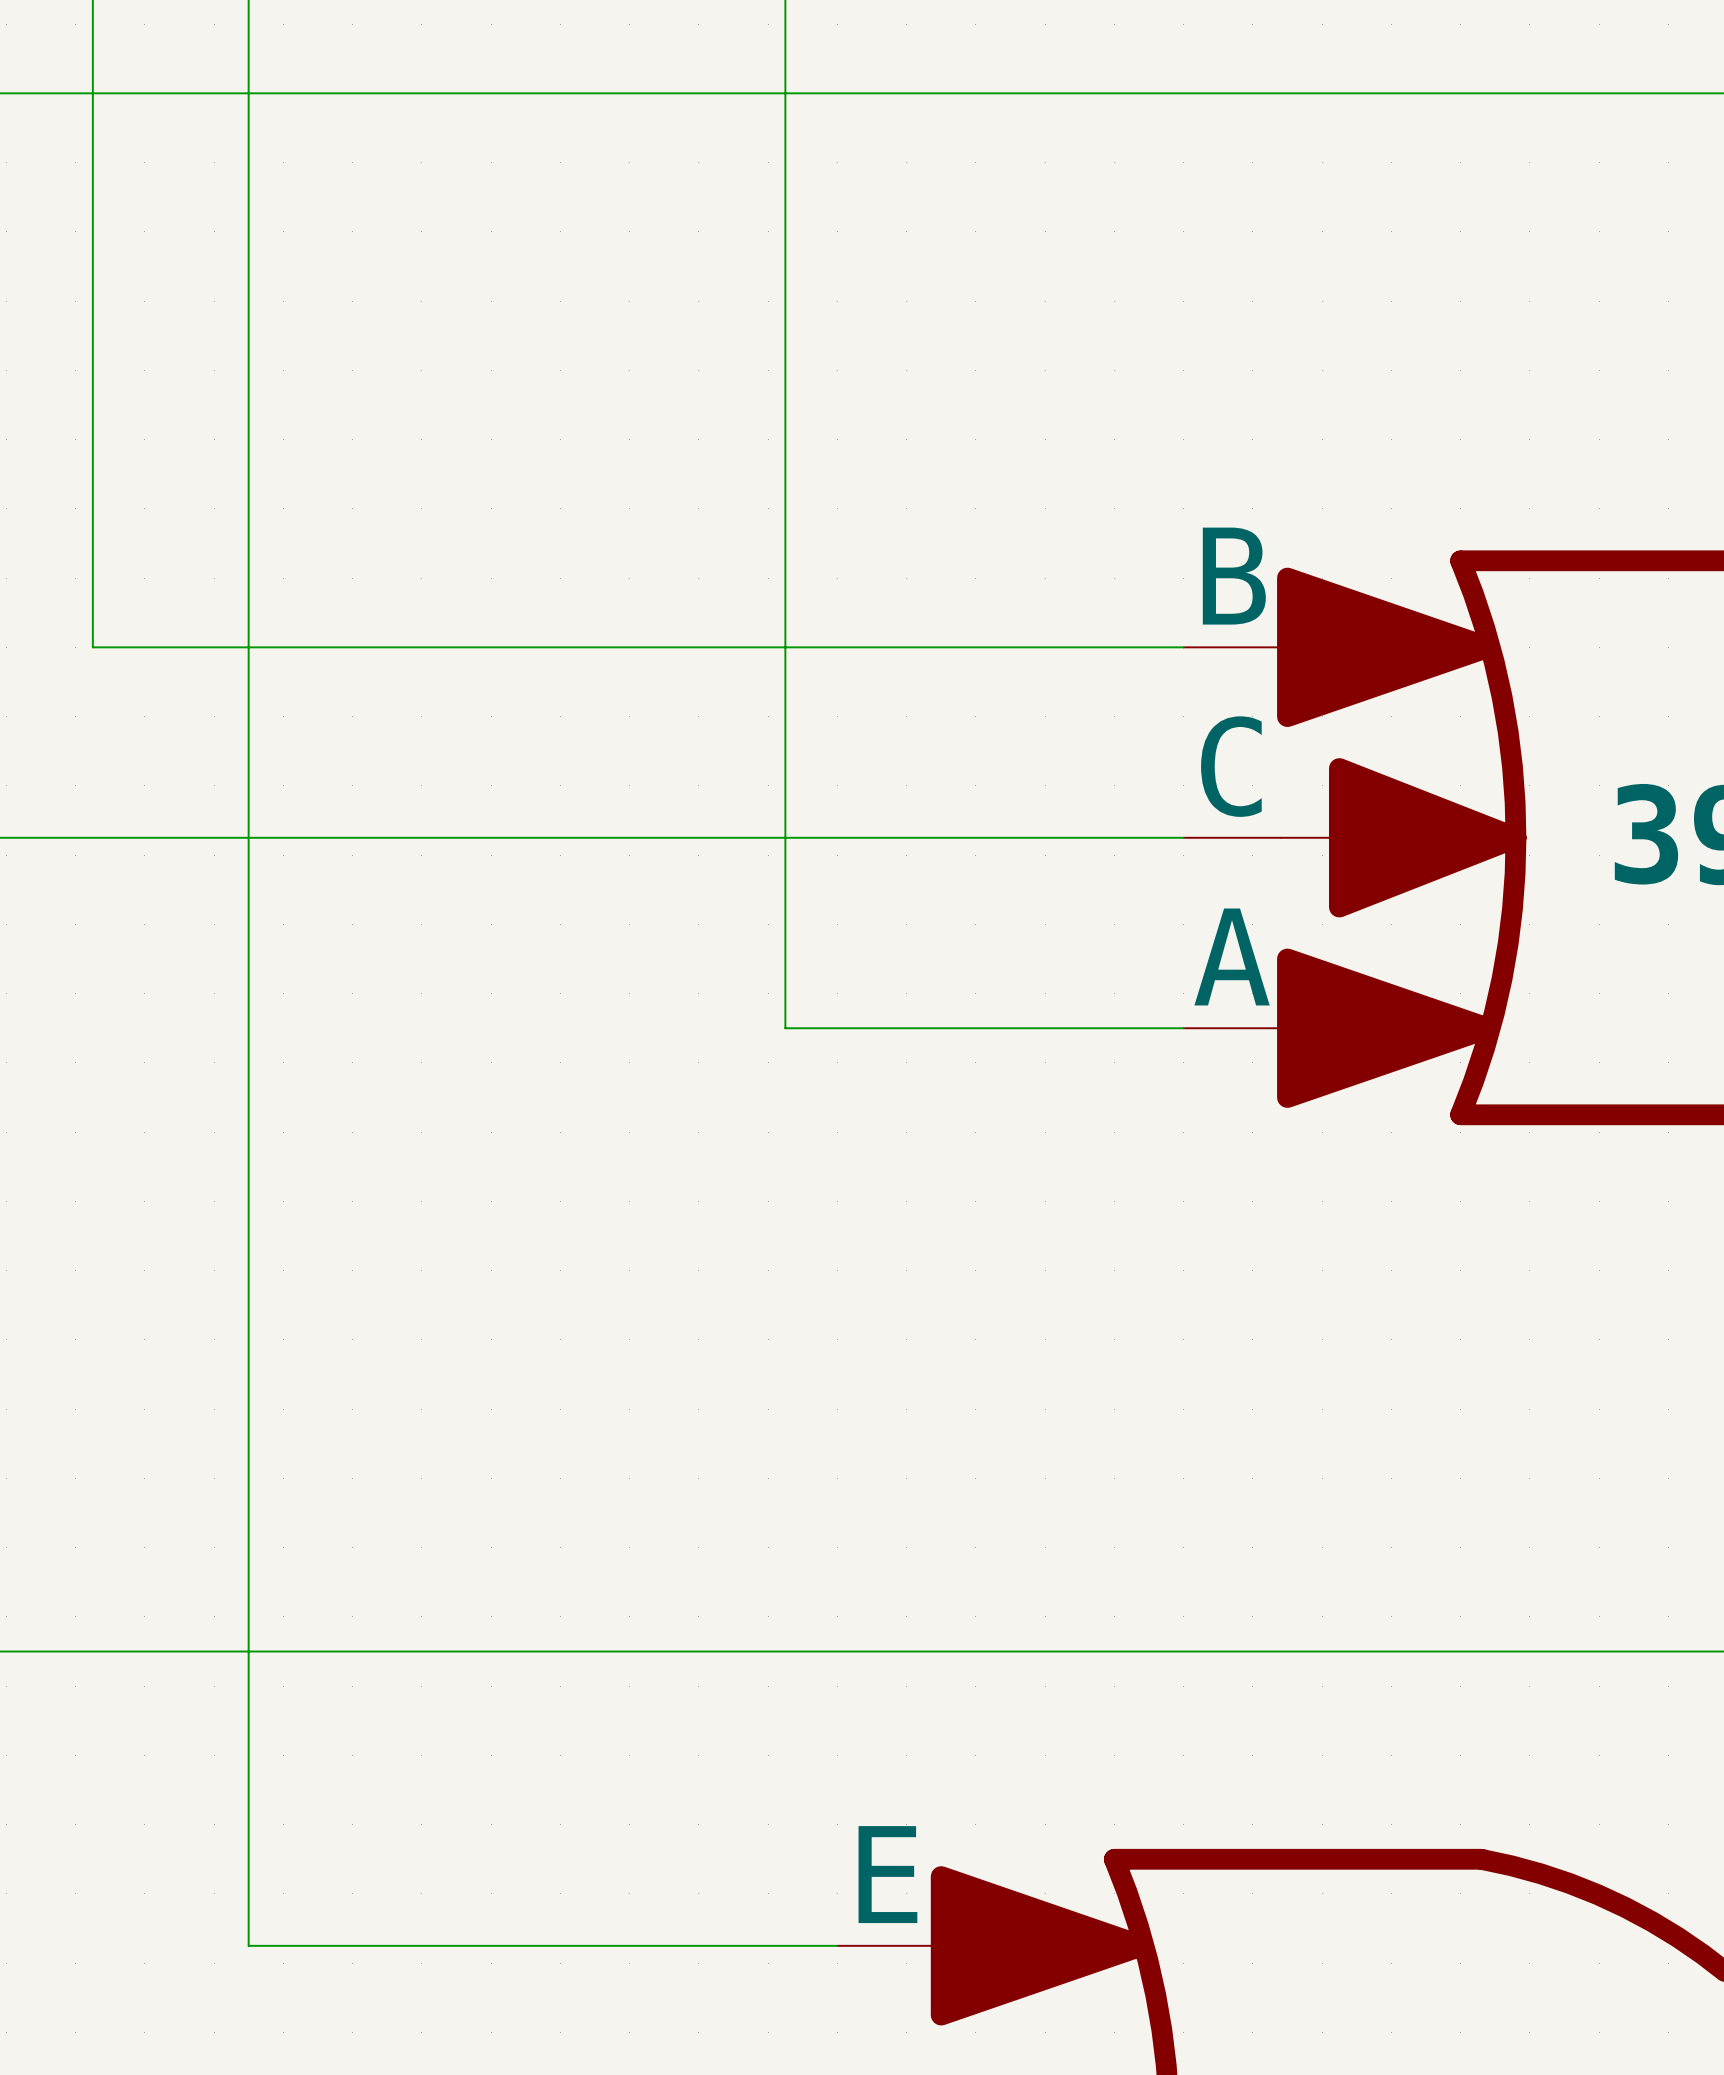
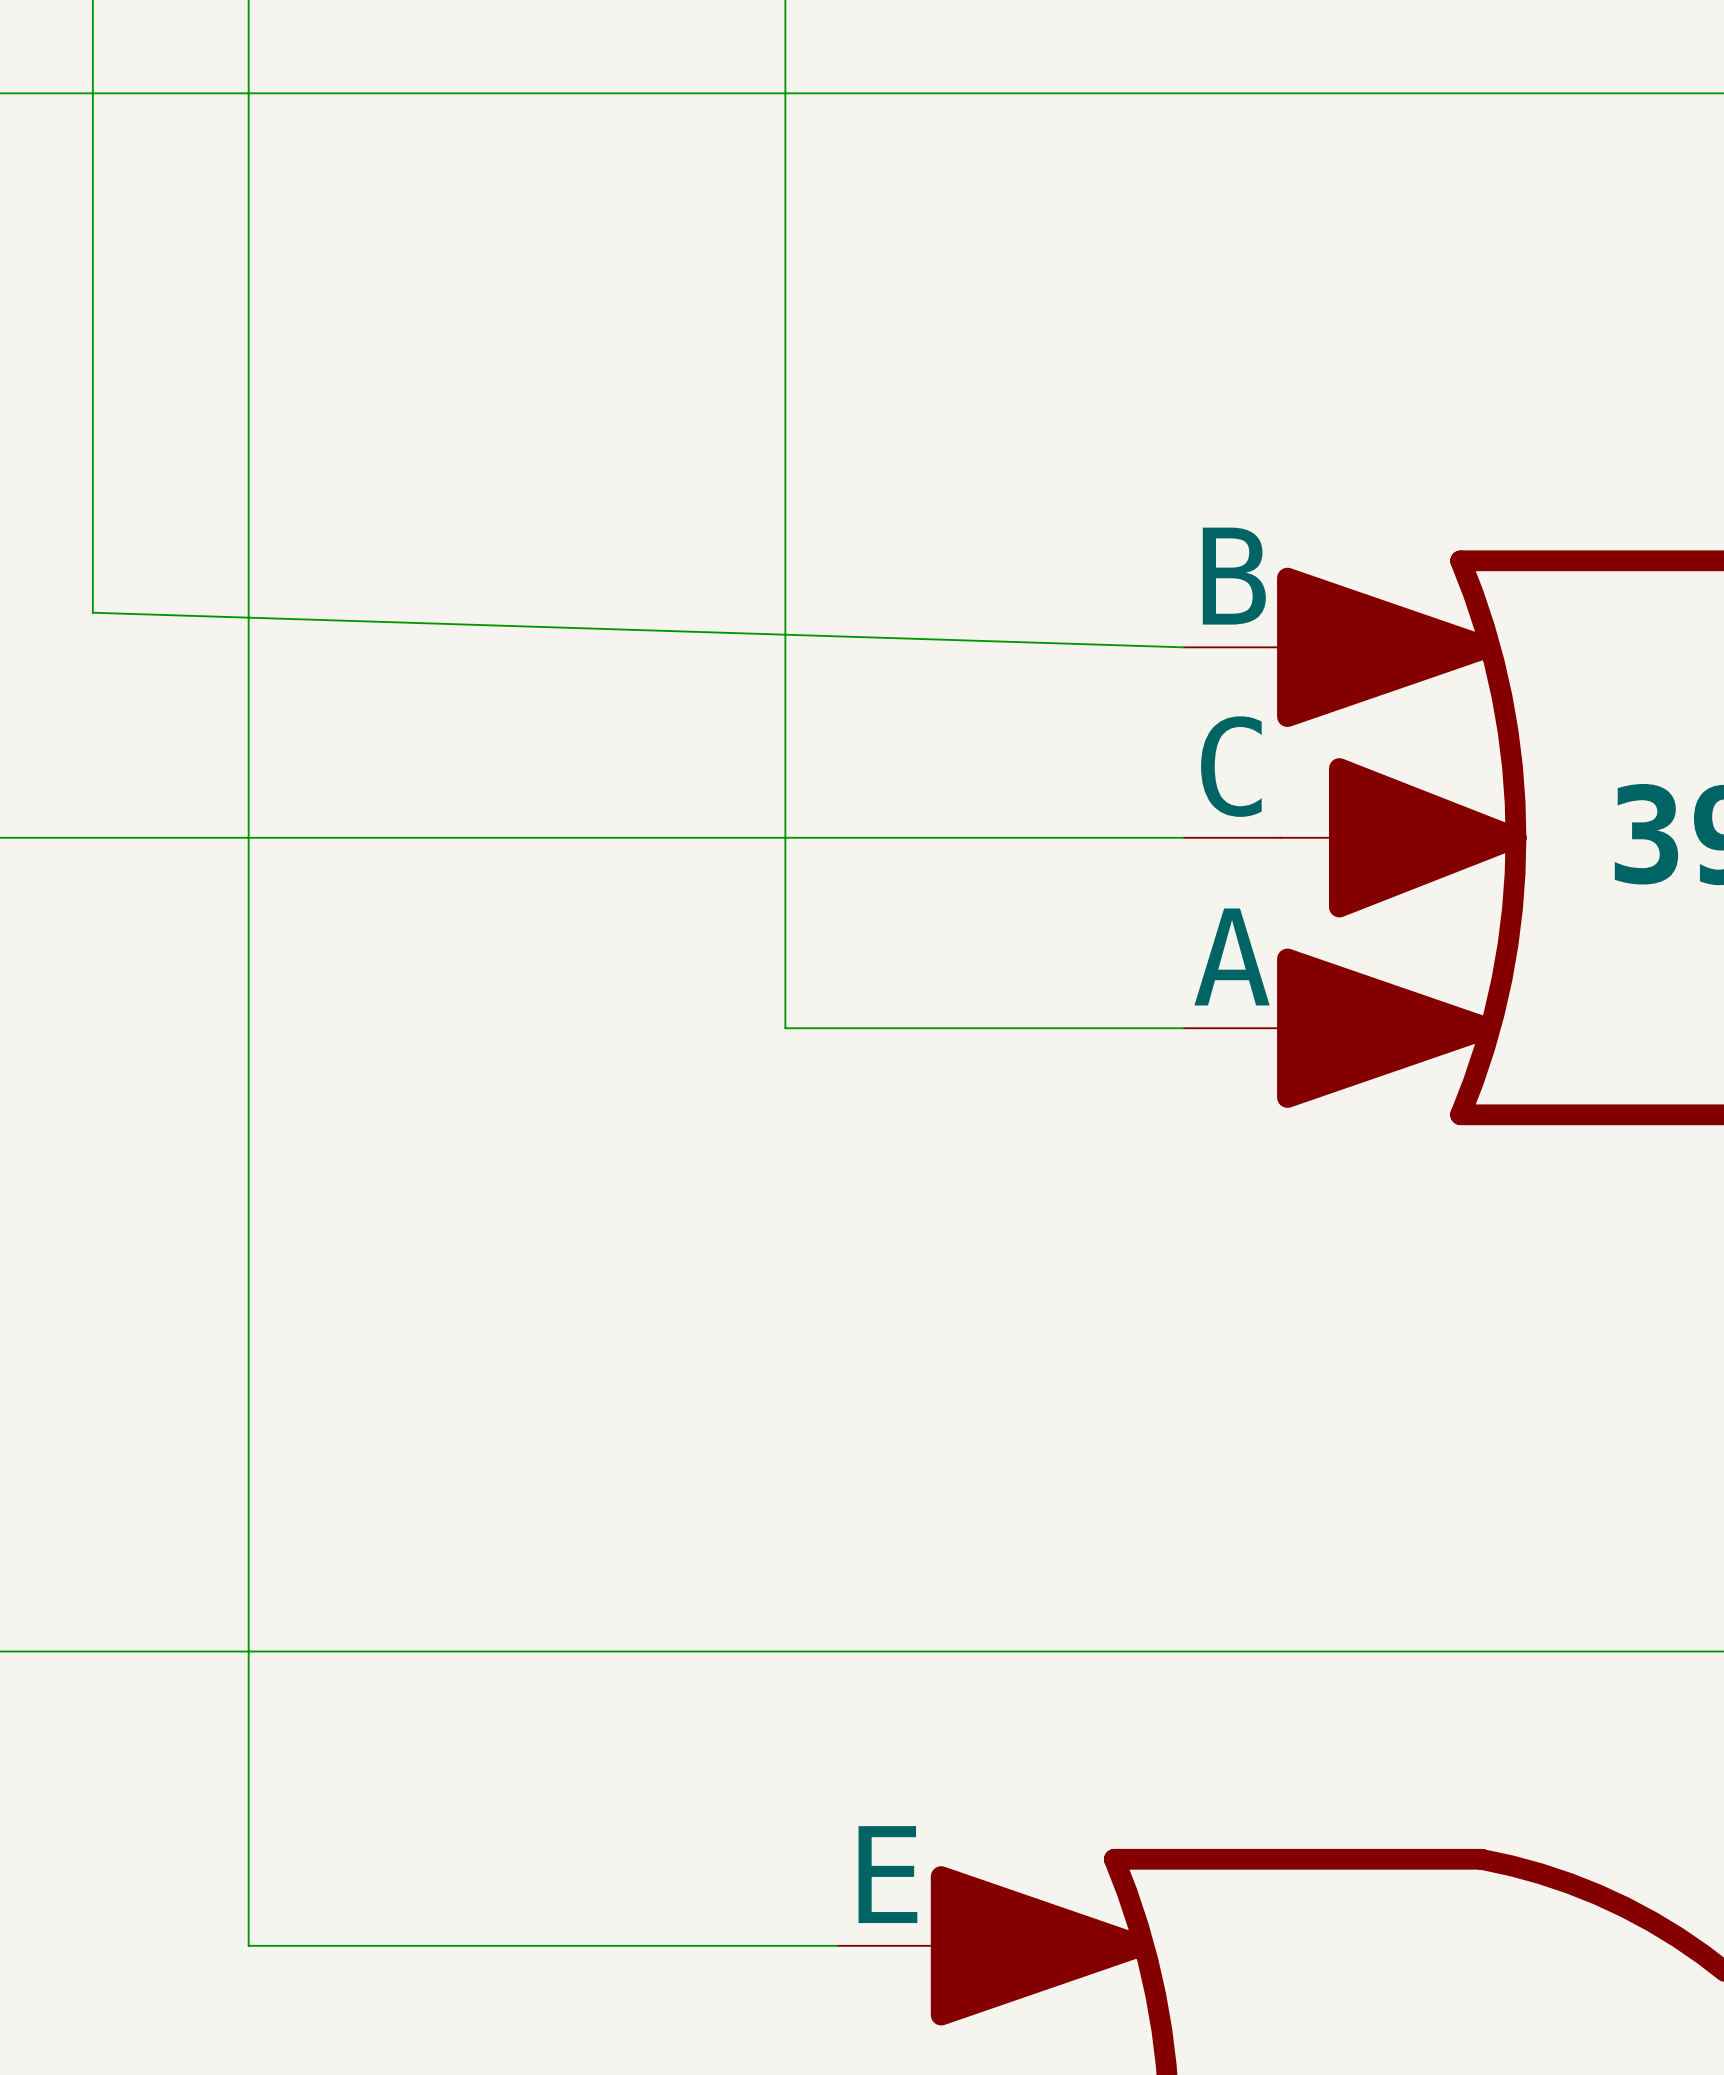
wire: (92, 612) (92, 647) (1183, 647) -> (92, 612) (1183, 647)

